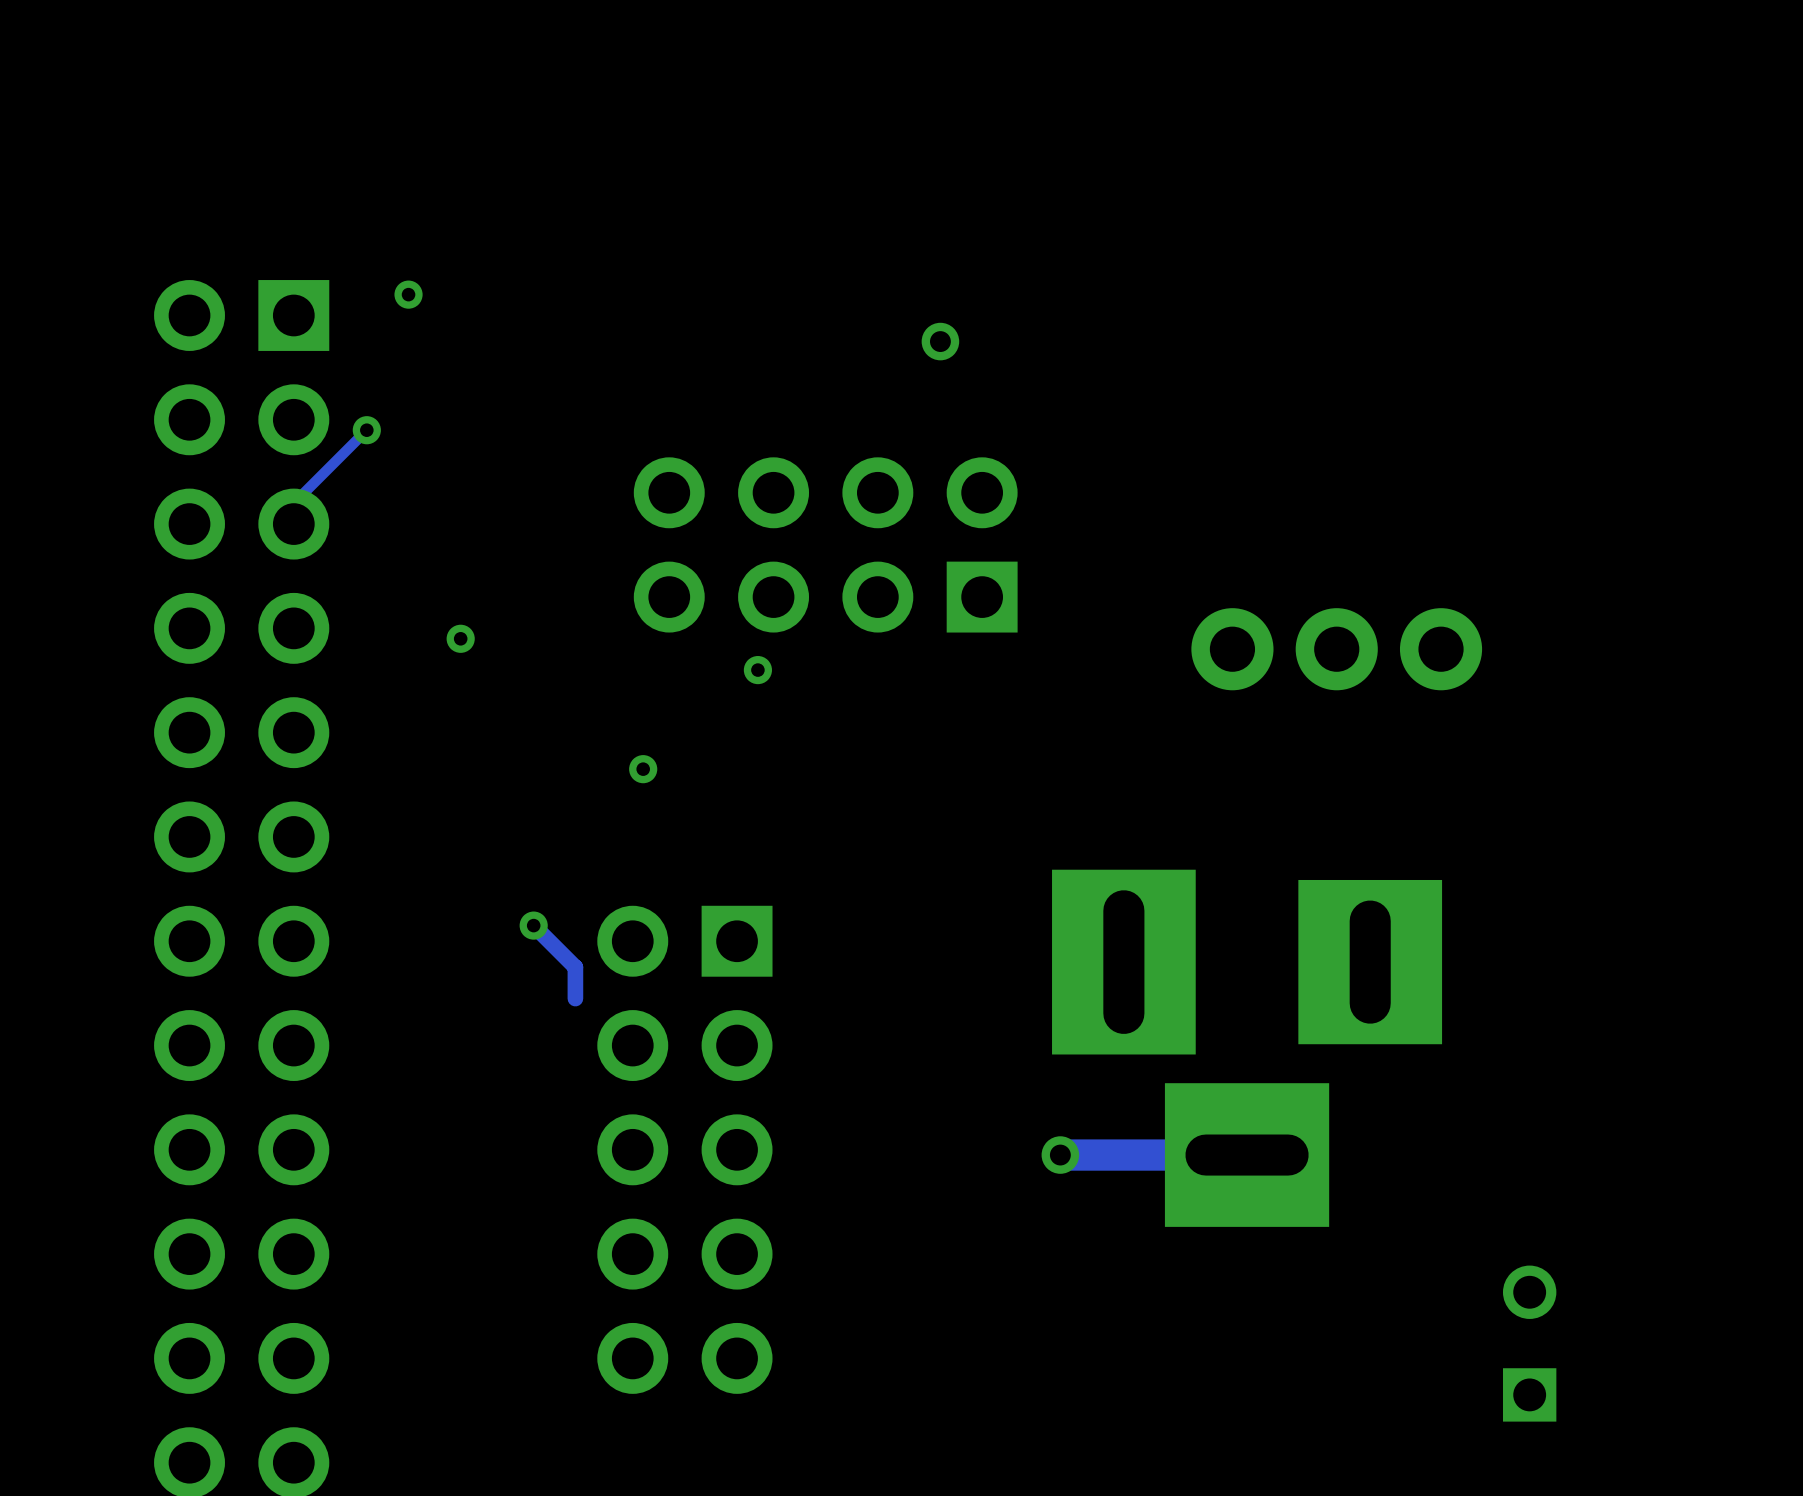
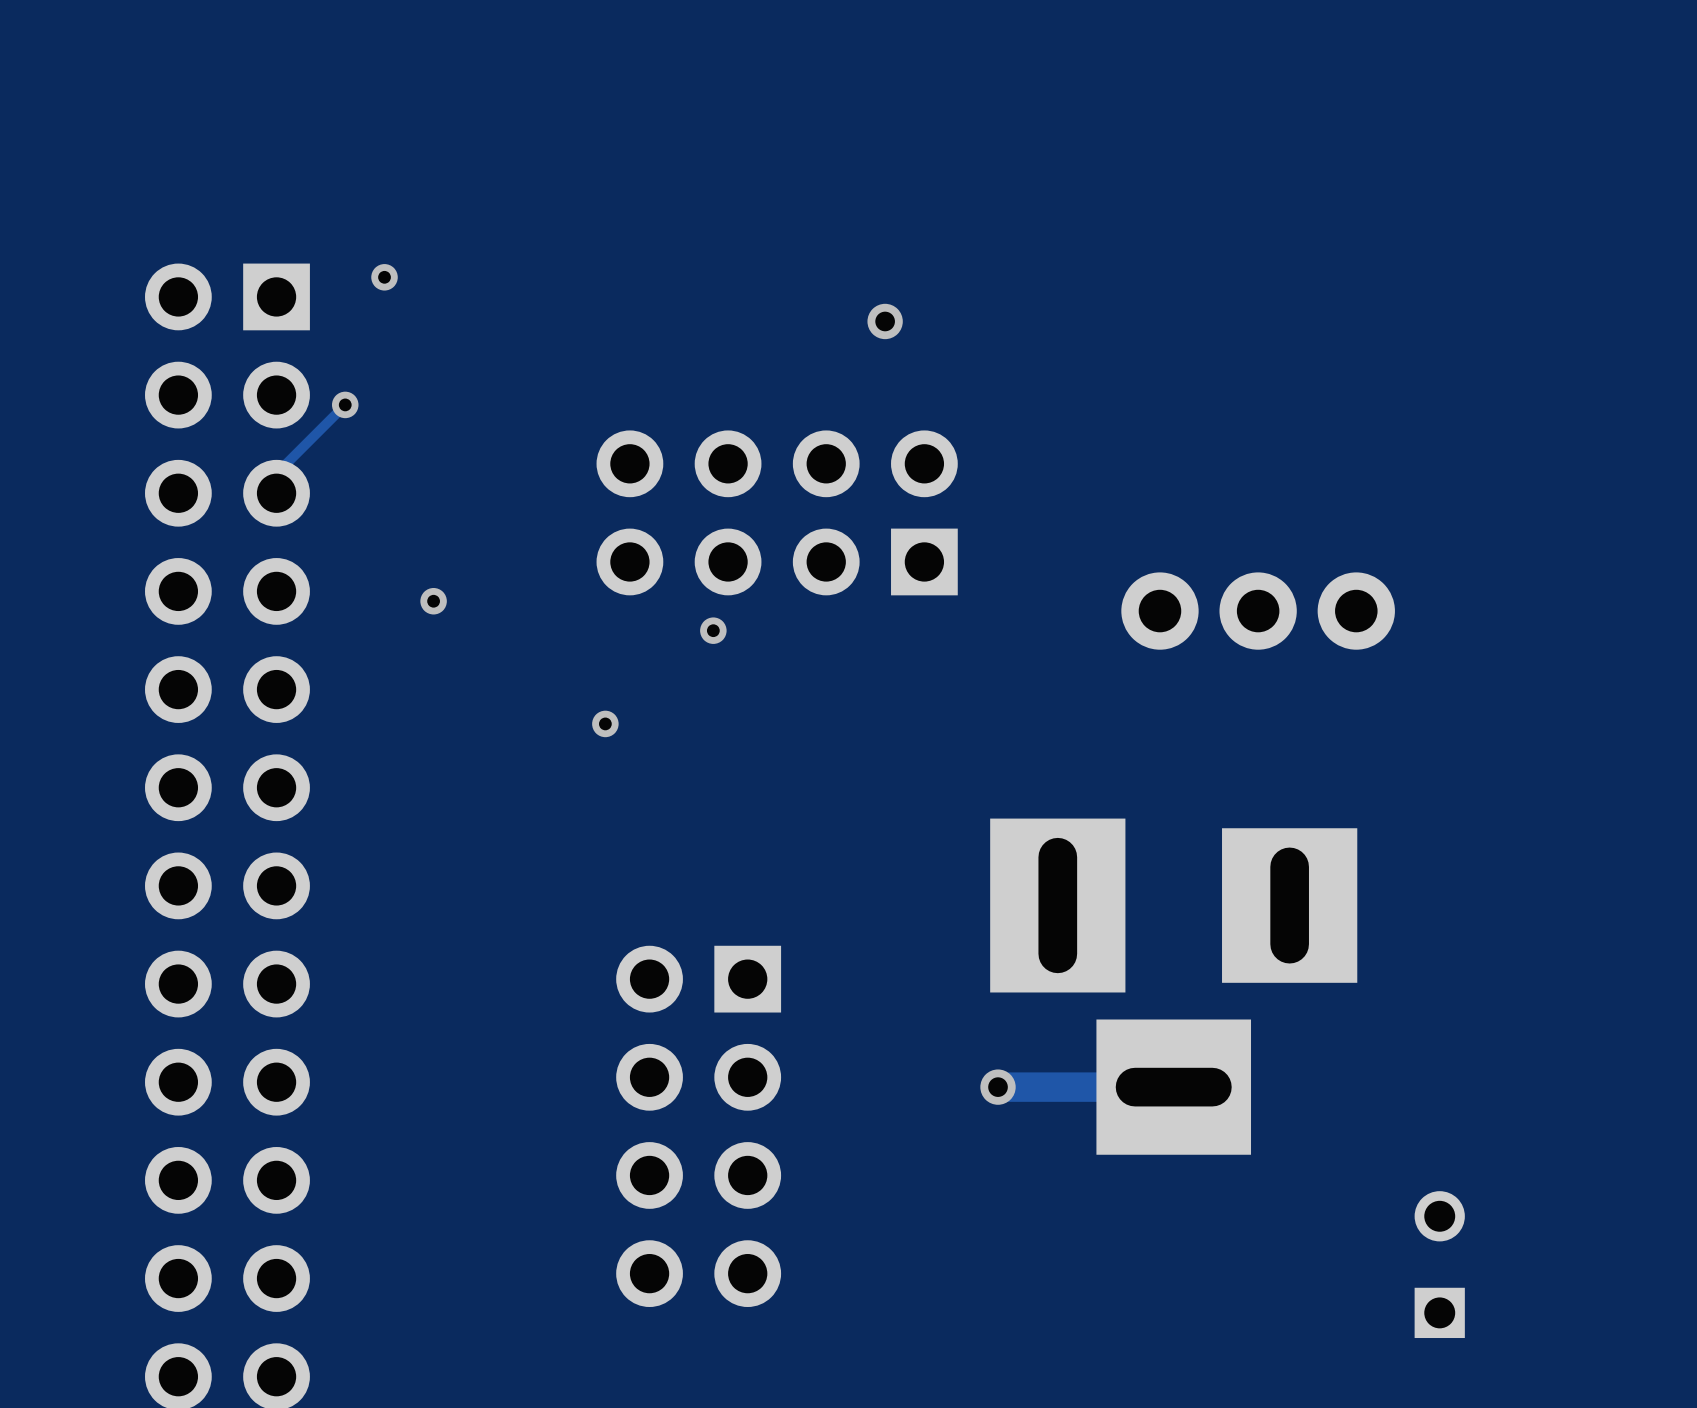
track: (533, 925) (575, 967) (575, 998) -> none
via: (533, 925) -> none
part: (684, 1149) -> none
part: none -> (698, 1126)

